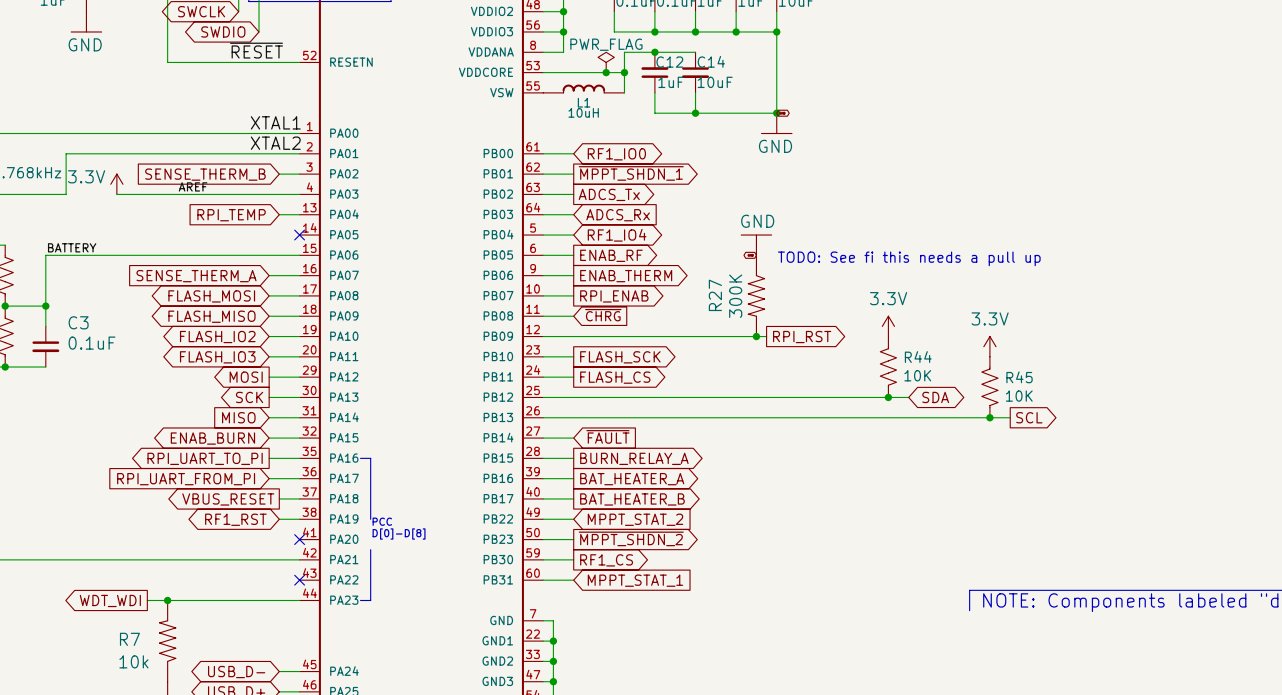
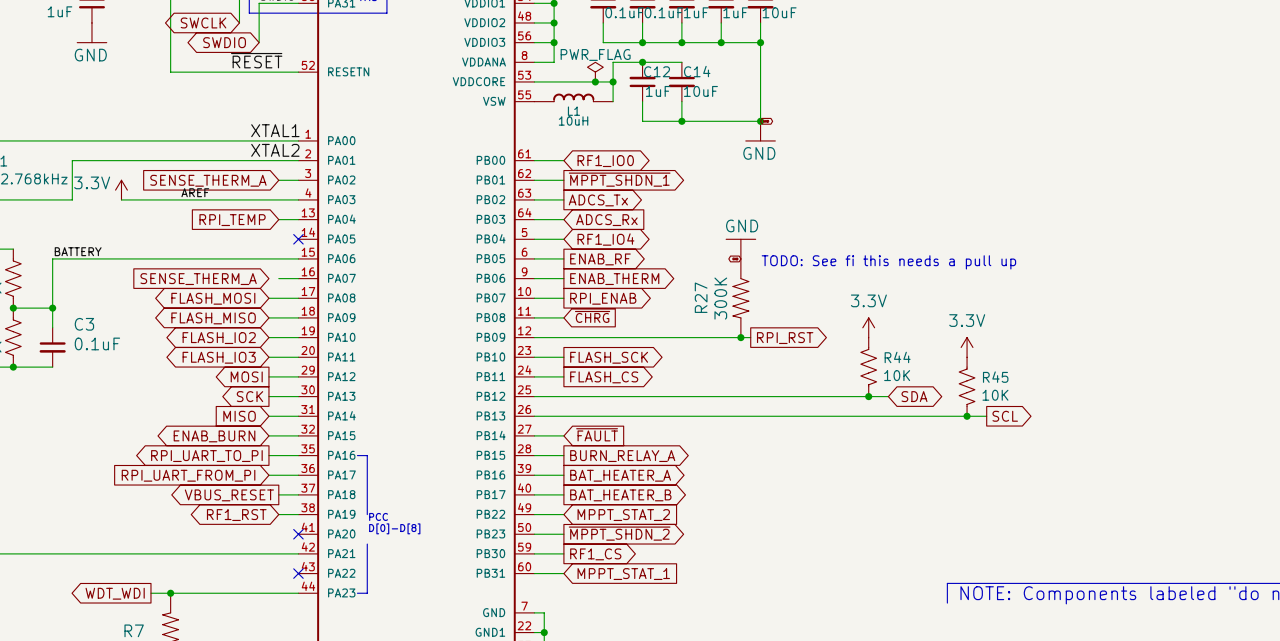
global label: SENSE_THERM_B (205, 174) -> SENSE_THERM_A (208, 180)
wire: (269, 275) (279, 275) -> none

